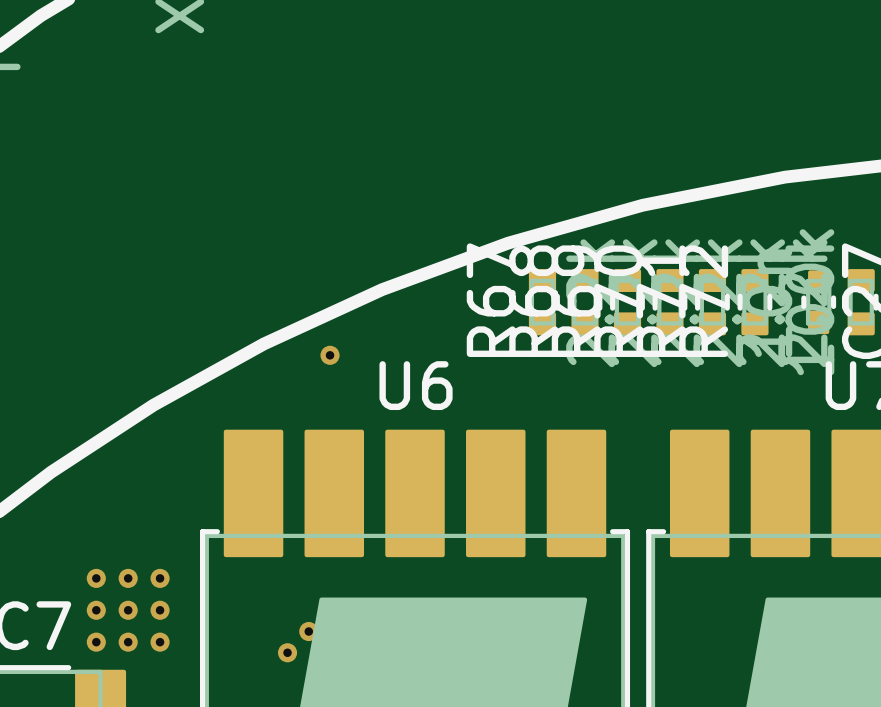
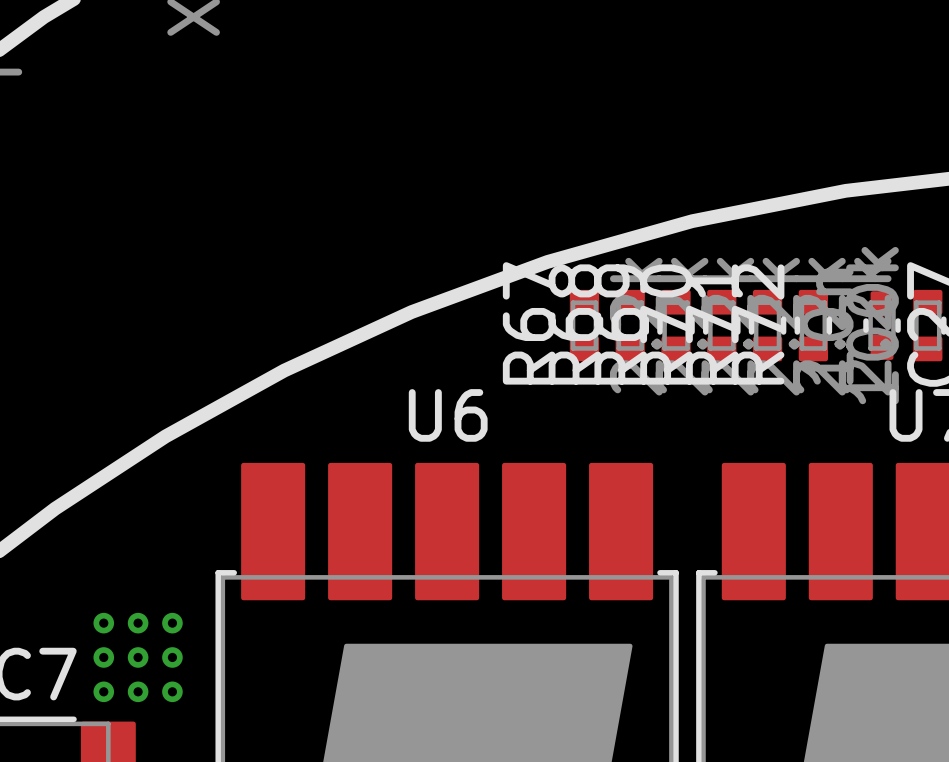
via: (330, 355) -> none
via: (308, 631) -> none
via: (287, 652) -> none

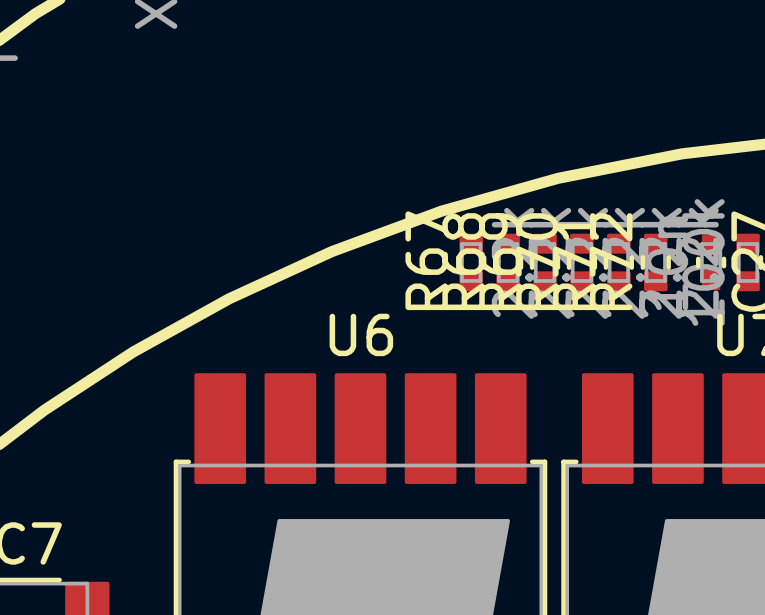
via: (103, 623) -> none
via: (138, 623) -> none
via: (172, 623) -> none
via: (103, 657) -> none
via: (138, 657) -> none
via: (172, 657) -> none
via: (103, 691) -> none
via: (138, 691) -> none
via: (172, 691) -> none

